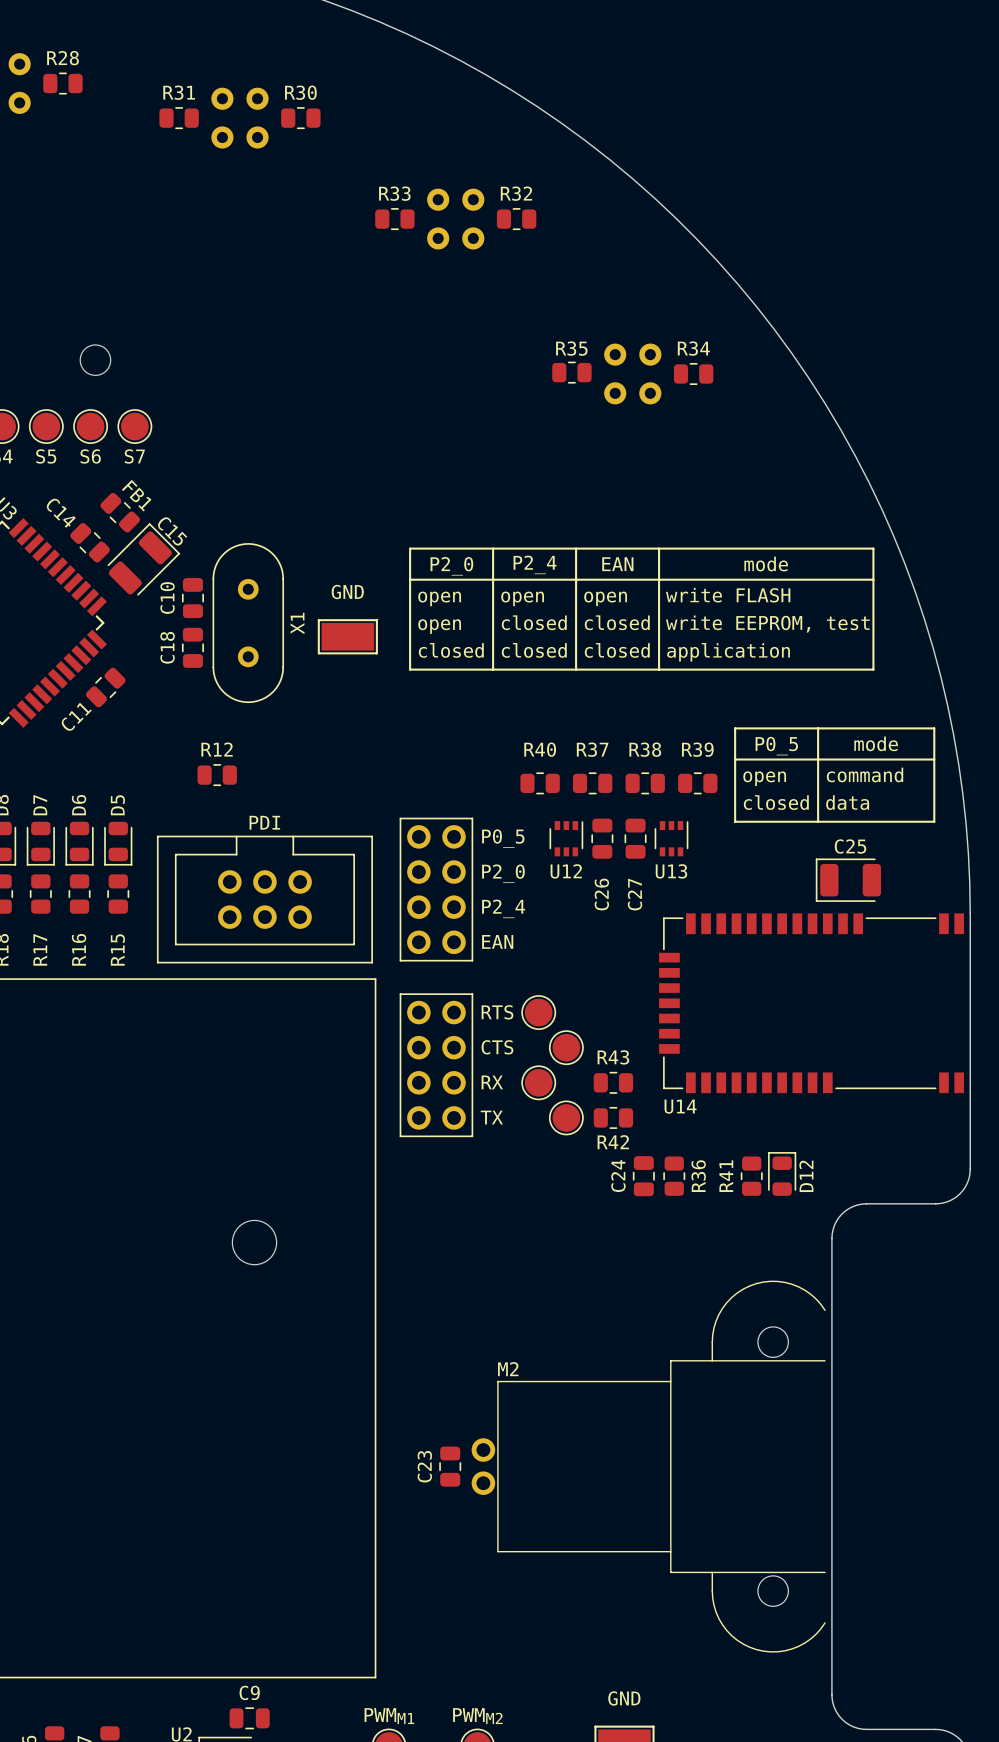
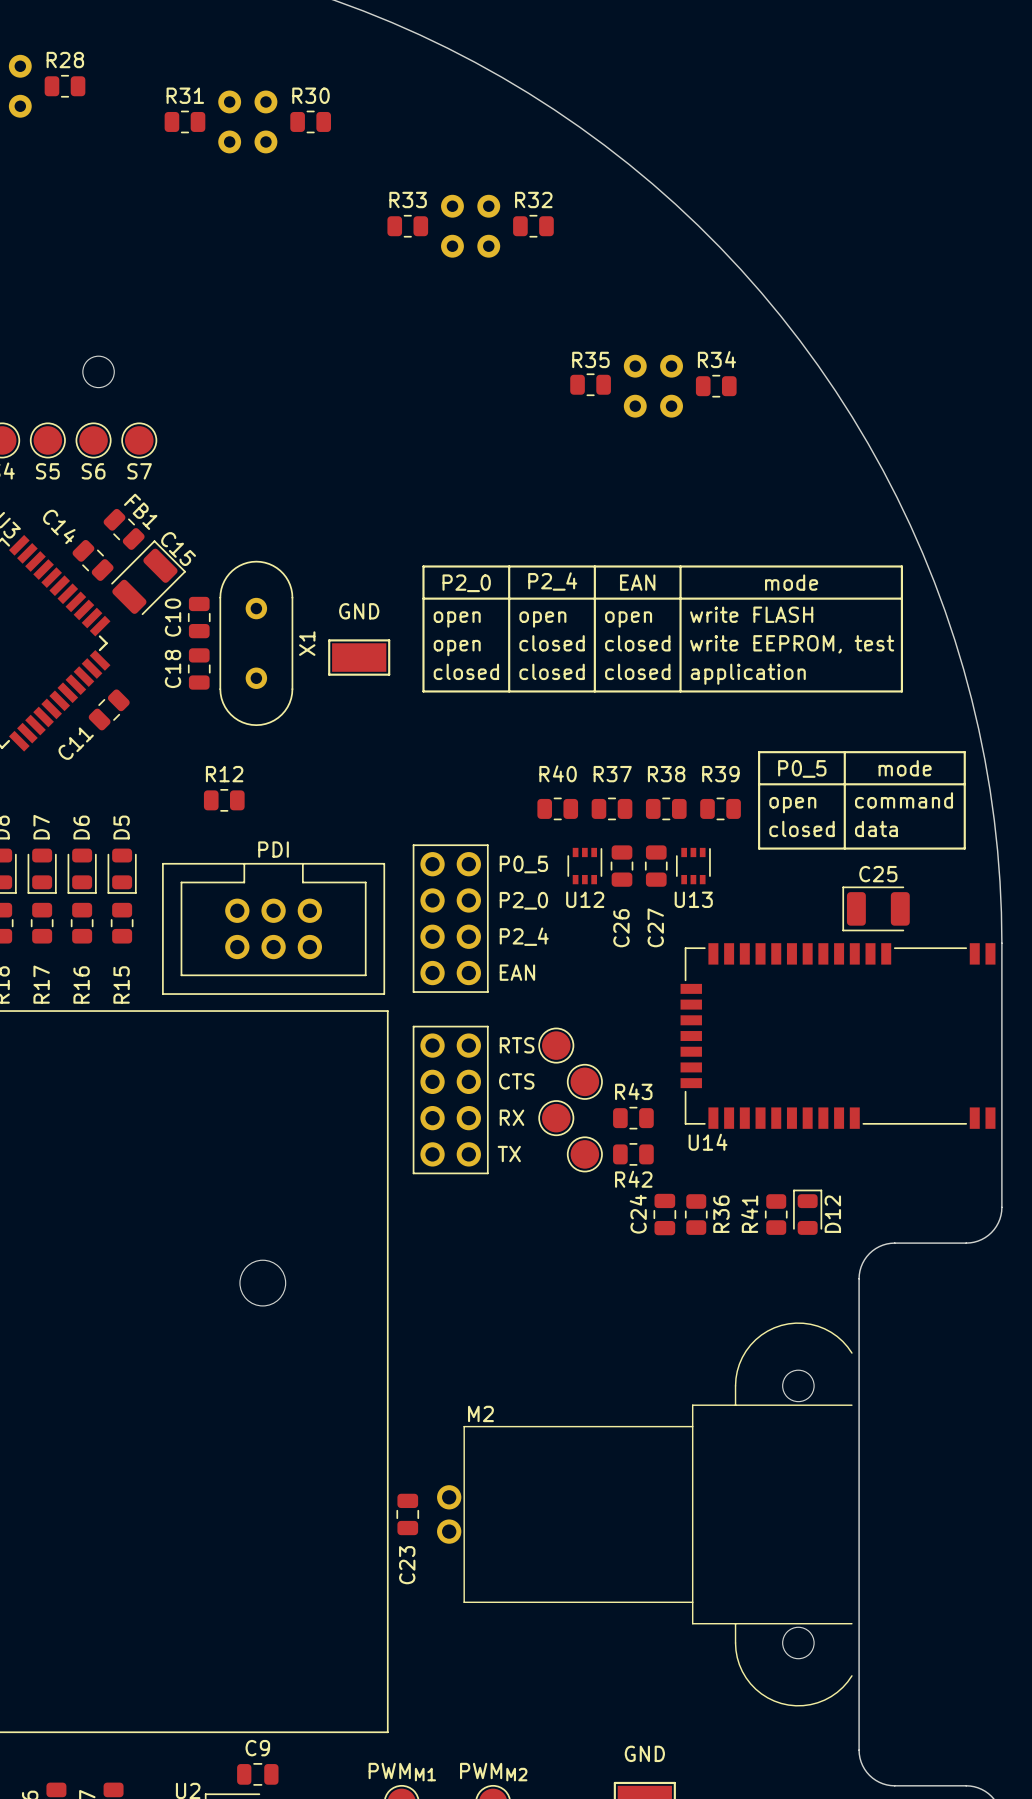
M2 footprint: [471, 1280, 826, 1653] -> [437, 1322, 853, 1707]
C23 name position: C23 (424, 1466) -> C23 (407, 1565)
C23 position: (450, 1466) -> (407, 1514)

